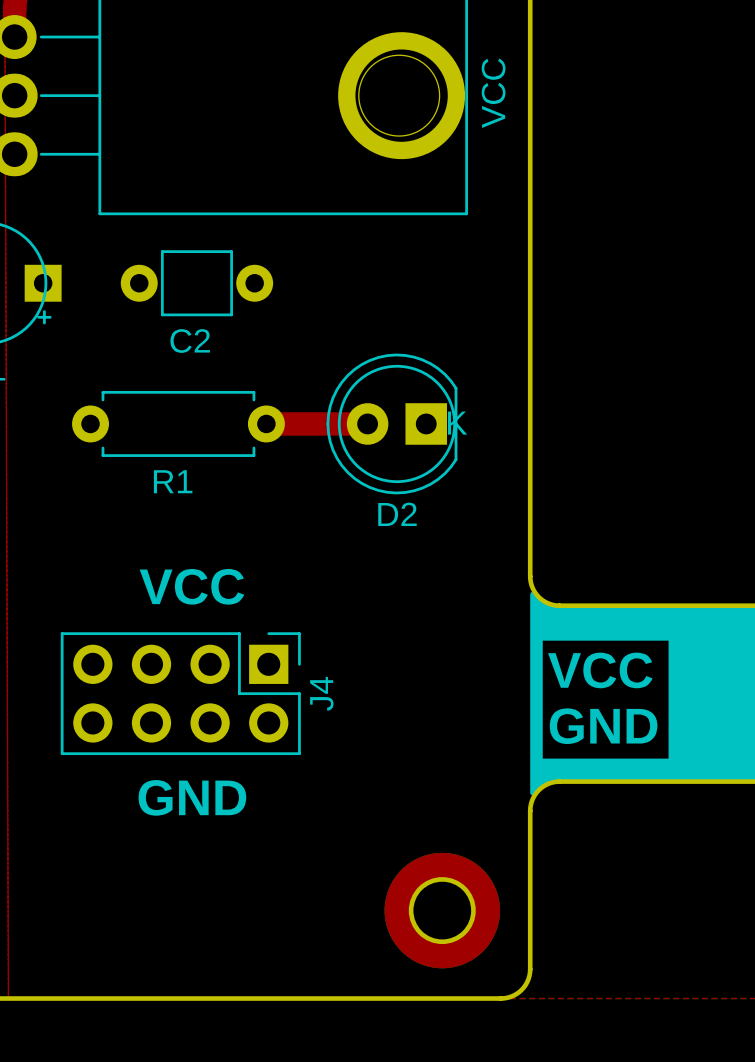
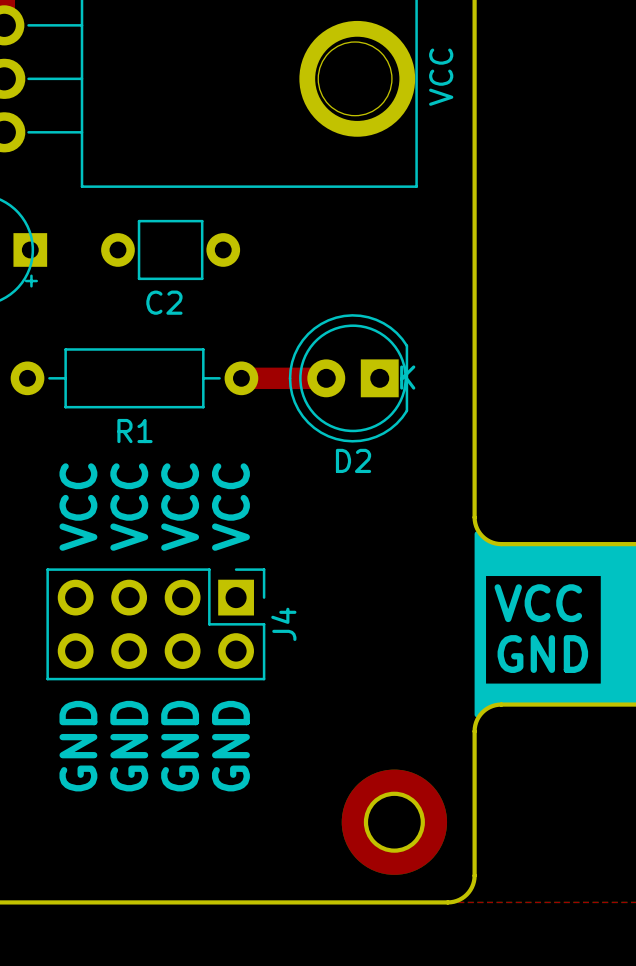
R1 footprint: [72, 390, 285, 457] -> [10, 348, 259, 409]
text: none -> VCC (78, 507)
text: none -> VCC (129, 507)
text: none -> VCC (180, 507)
text: none -> VCC (230, 507)
text: VCC (191, 586) -> none
text: GND (192, 797) -> none
text: none -> GND (78, 746)
text: none -> GND (129, 746)
text: none -> GND (180, 746)
text: none -> GND (230, 746)

